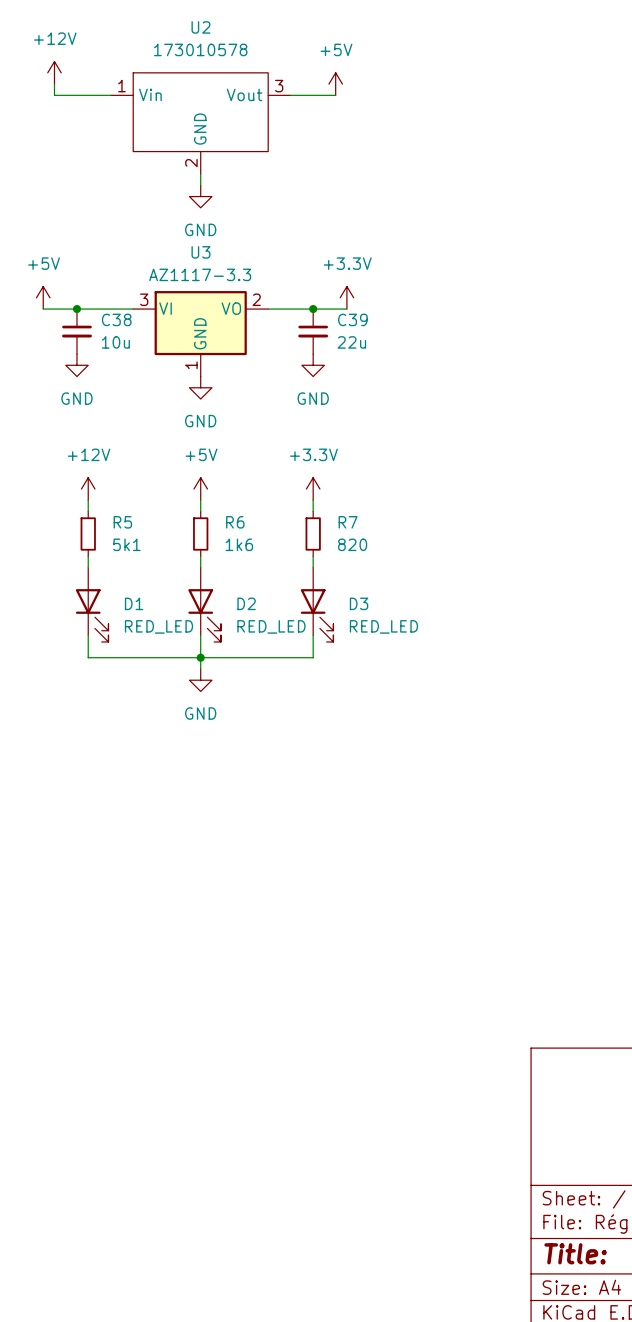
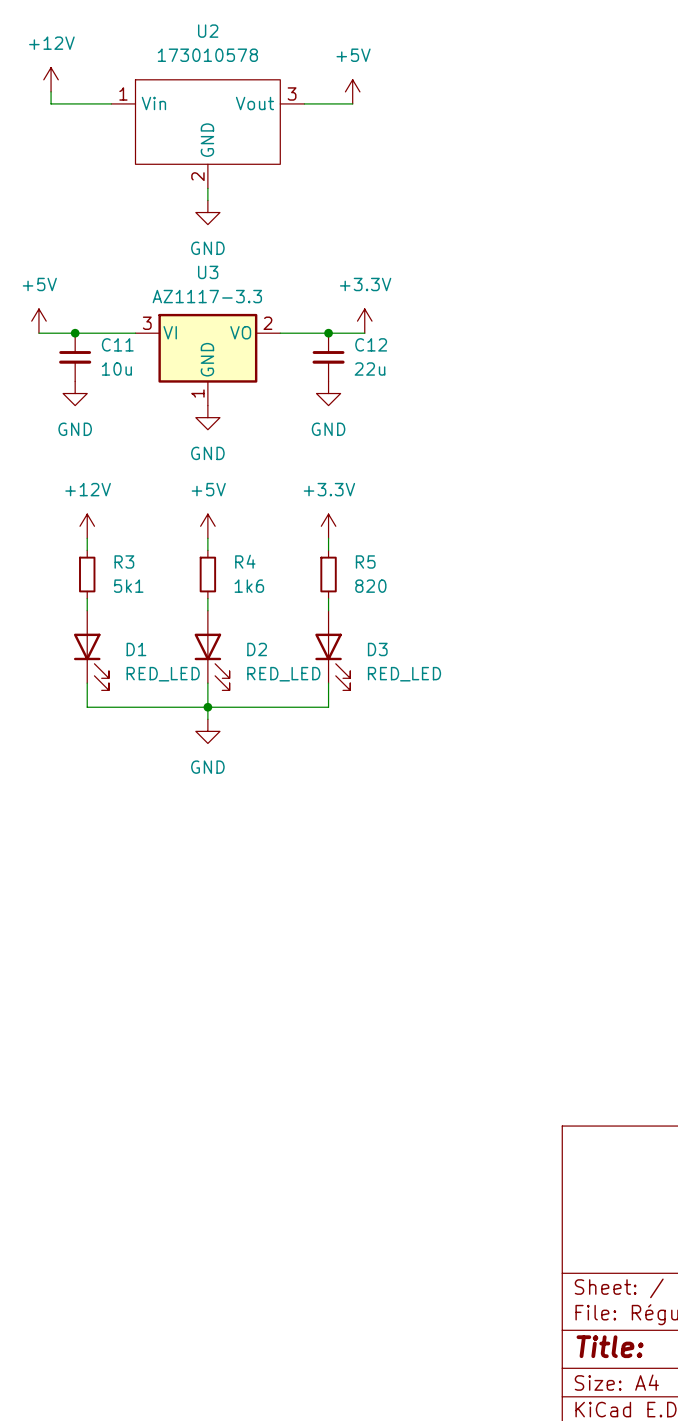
C38 name: C38 (116, 319) -> C11 (117, 344)
C39 name: C39 (352, 319) -> C12 (371, 344)
R5 name: R5 (122, 522) -> R3 (124, 562)
R6 name: R6 (235, 522) -> R4 (245, 561)
R7 name: R7 (348, 522) -> R5 (365, 562)

